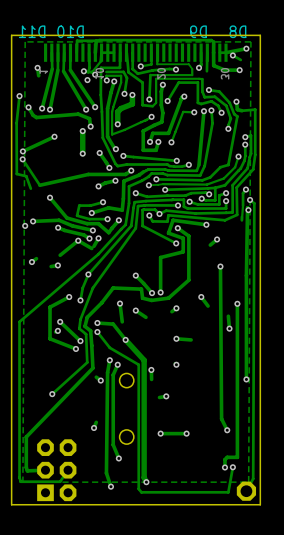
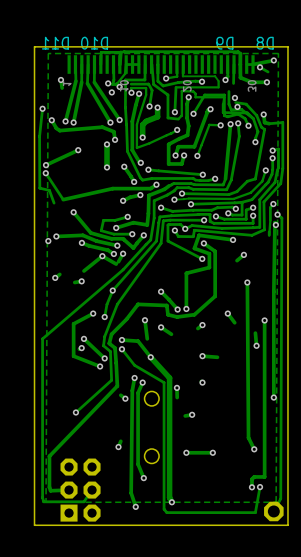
track: (156, 78) (202, 79) -> (181, 91) (193, 91) (195, 97) (224, 97) (223, 112) (247, 112) (253, 118)
via: none -> (234, 97)
via: (208, 90) -> none
via: none -> (237, 106)

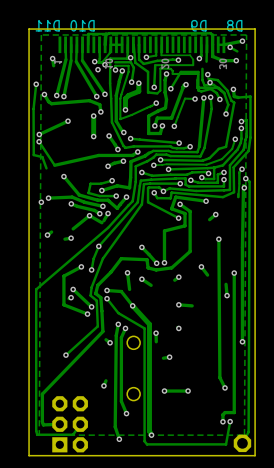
via: none -> (130, 57)

